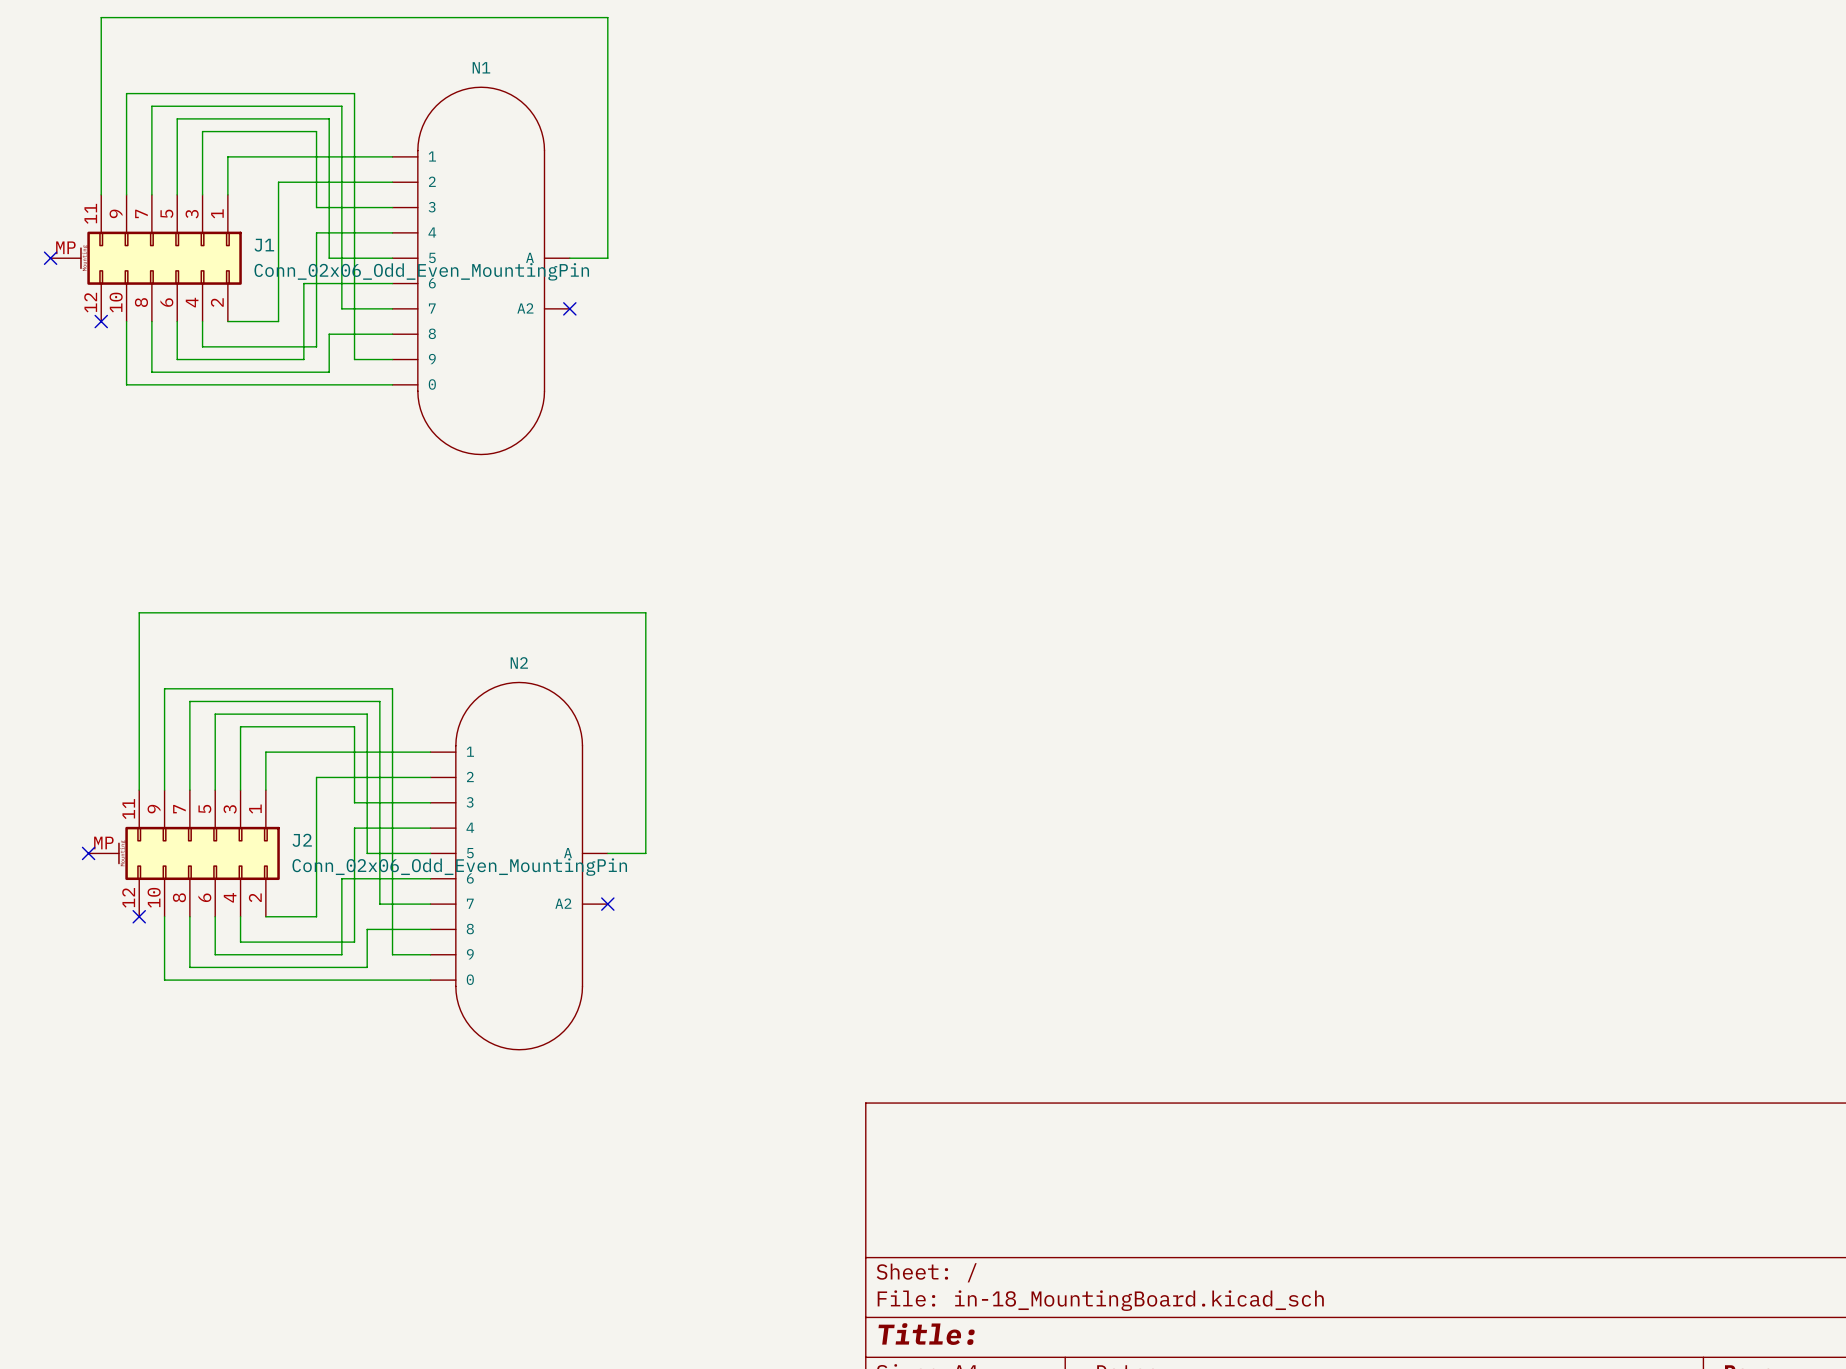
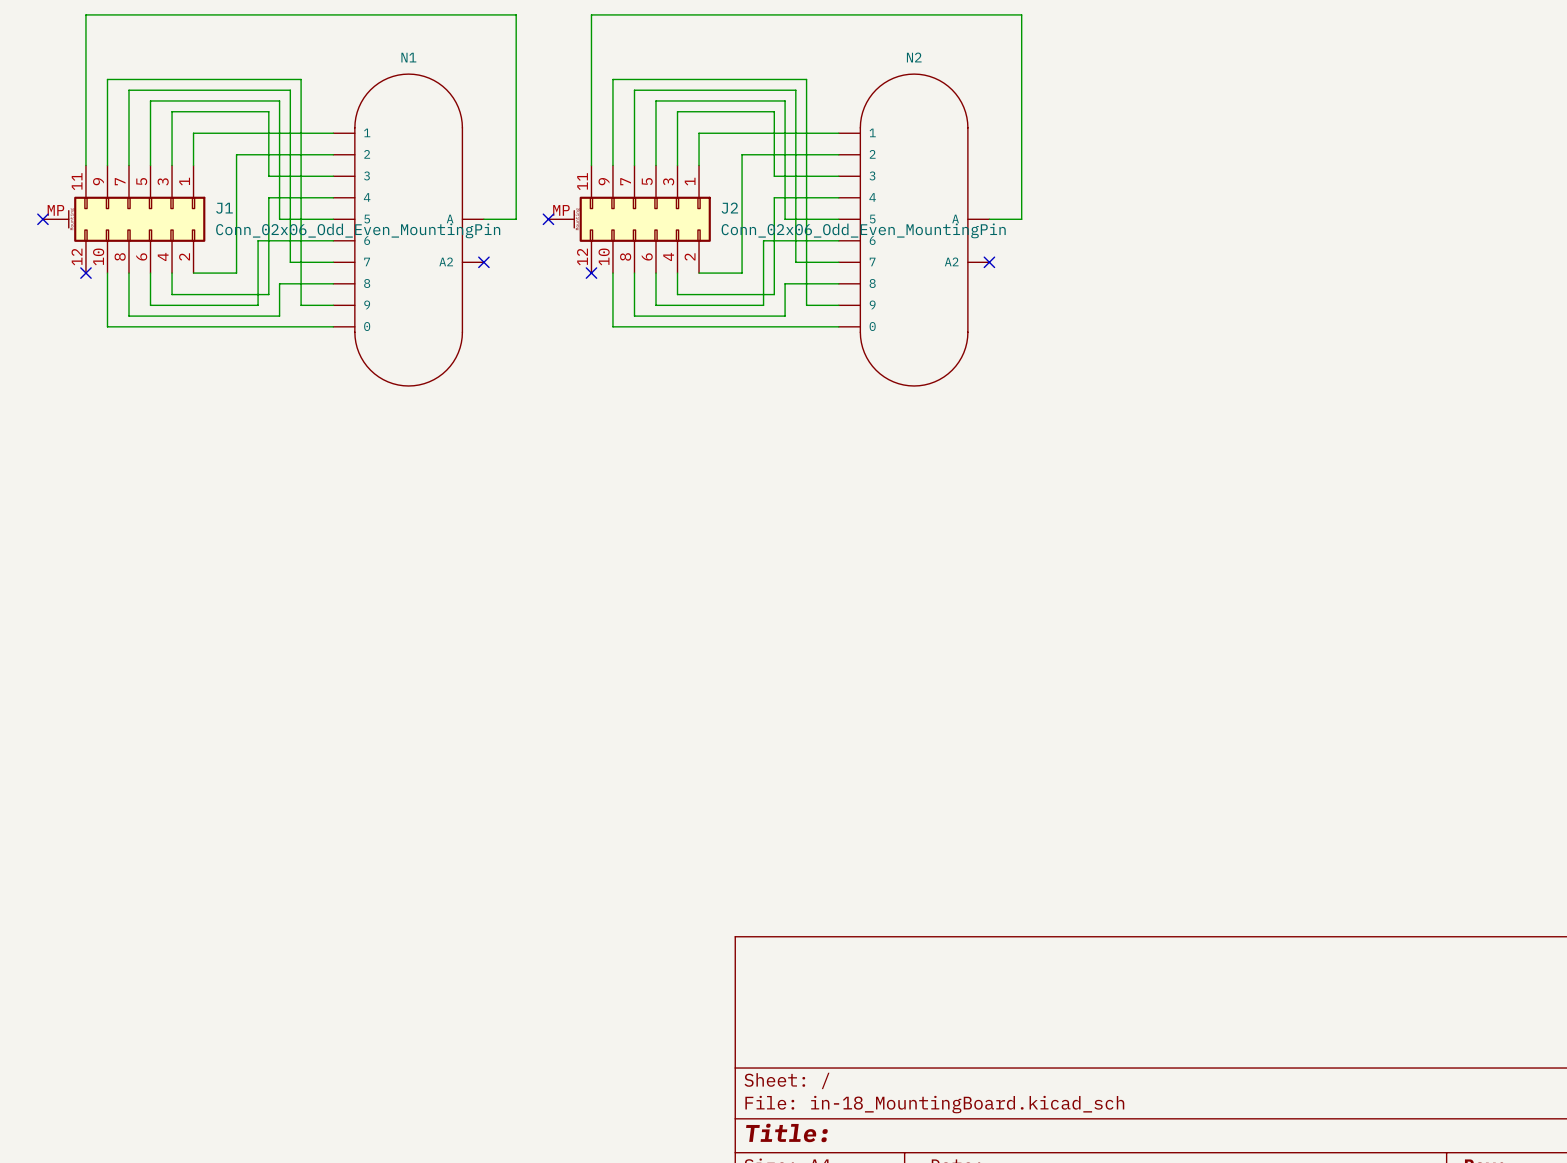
wire: none -> (838, 133) (699, 133) (699, 165)
wire: none -> (838, 154) (742, 154) (742, 273) (699, 273)
wire: none -> (591, 165) (591, 14) (1021, 14) (1021, 219) (989, 219)
wire: none -> (612, 165) (612, 79) (806, 79) (806, 305) (838, 305)
wire: none -> (634, 165) (634, 90) (795, 90) (795, 262) (838, 262)
wire: none -> (656, 165) (656, 100) (785, 100) (785, 219) (838, 219)
wire: none -> (677, 165) (677, 111) (774, 111) (774, 176) (838, 176)
wire: none -> (838, 197) (774, 197) (774, 294) (677, 294) (677, 273)
no-connect mark: none -> (548, 219)
wire: none -> (838, 240) (763, 240) (763, 305) (656, 305) (656, 273)
no-connect mark: none -> (989, 262)
no-connect mark: none -> (591, 273)
wire: none -> (612, 273) (612, 326) (838, 326)
wire: none -> (634, 273) (634, 316) (785, 316) (785, 283) (838, 283)
wire: (430, 752) (265, 752) (265, 790) -> none
wire: (430, 777) (316, 777) (316, 916) (265, 916) -> none
wire: (139, 790) (139, 612) (645, 612) (645, 853) (607, 853) -> none
wire: (164, 790) (164, 688) (392, 688) (392, 954) (430, 954) -> none
wire: (189, 790) (189, 701) (379, 701) (379, 904) (430, 904) -> none
wire: (215, 790) (215, 714) (367, 714) (367, 853) (430, 853) -> none
wire: (240, 790) (240, 726) (354, 726) (354, 802) (430, 802) -> none
wire: (430, 828) (354, 828) (354, 942) (240, 942) (240, 916) -> none
no-connect mark: (88, 853) -> none
J2 position: (184, 853) -> (629, 219)
N2 position: (519, 866) -> (914, 230)
wire: (430, 878) (341, 878) (341, 954) (215, 954) (215, 916) -> none
no-connect mark: (607, 904) -> none
no-connect mark: (139, 916) -> none
wire: (164, 916) (164, 980) (430, 980) -> none
wire: (189, 916) (189, 967) (367, 967) (367, 929) (430, 929) -> none

